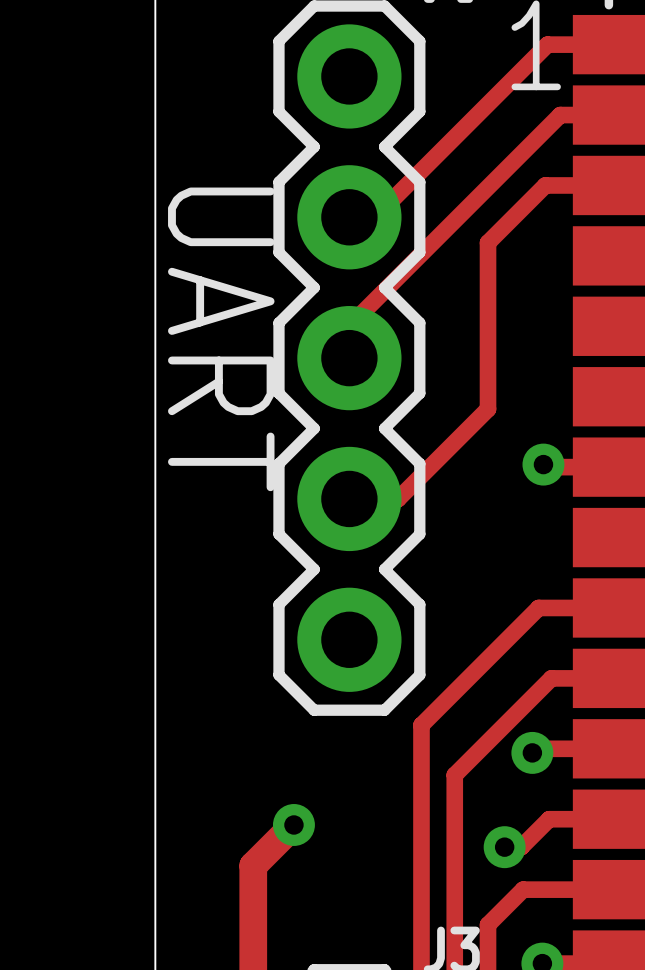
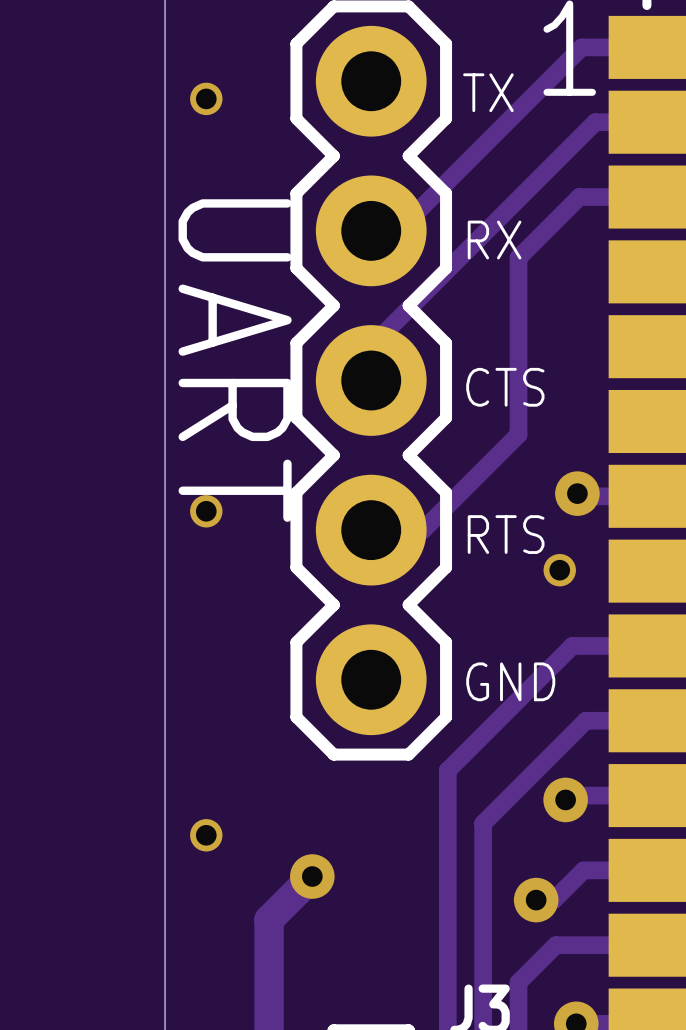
text: none -> TX (488, 92)
via: none -> (206, 98)
text: none -> RX (494, 240)
text: none -> CTS (505, 387)
via: none -> (206, 511)
text: none -> RTS (506, 534)
via: none -> (559, 570)
text: none -> GND (510, 681)
via: none -> (206, 835)

